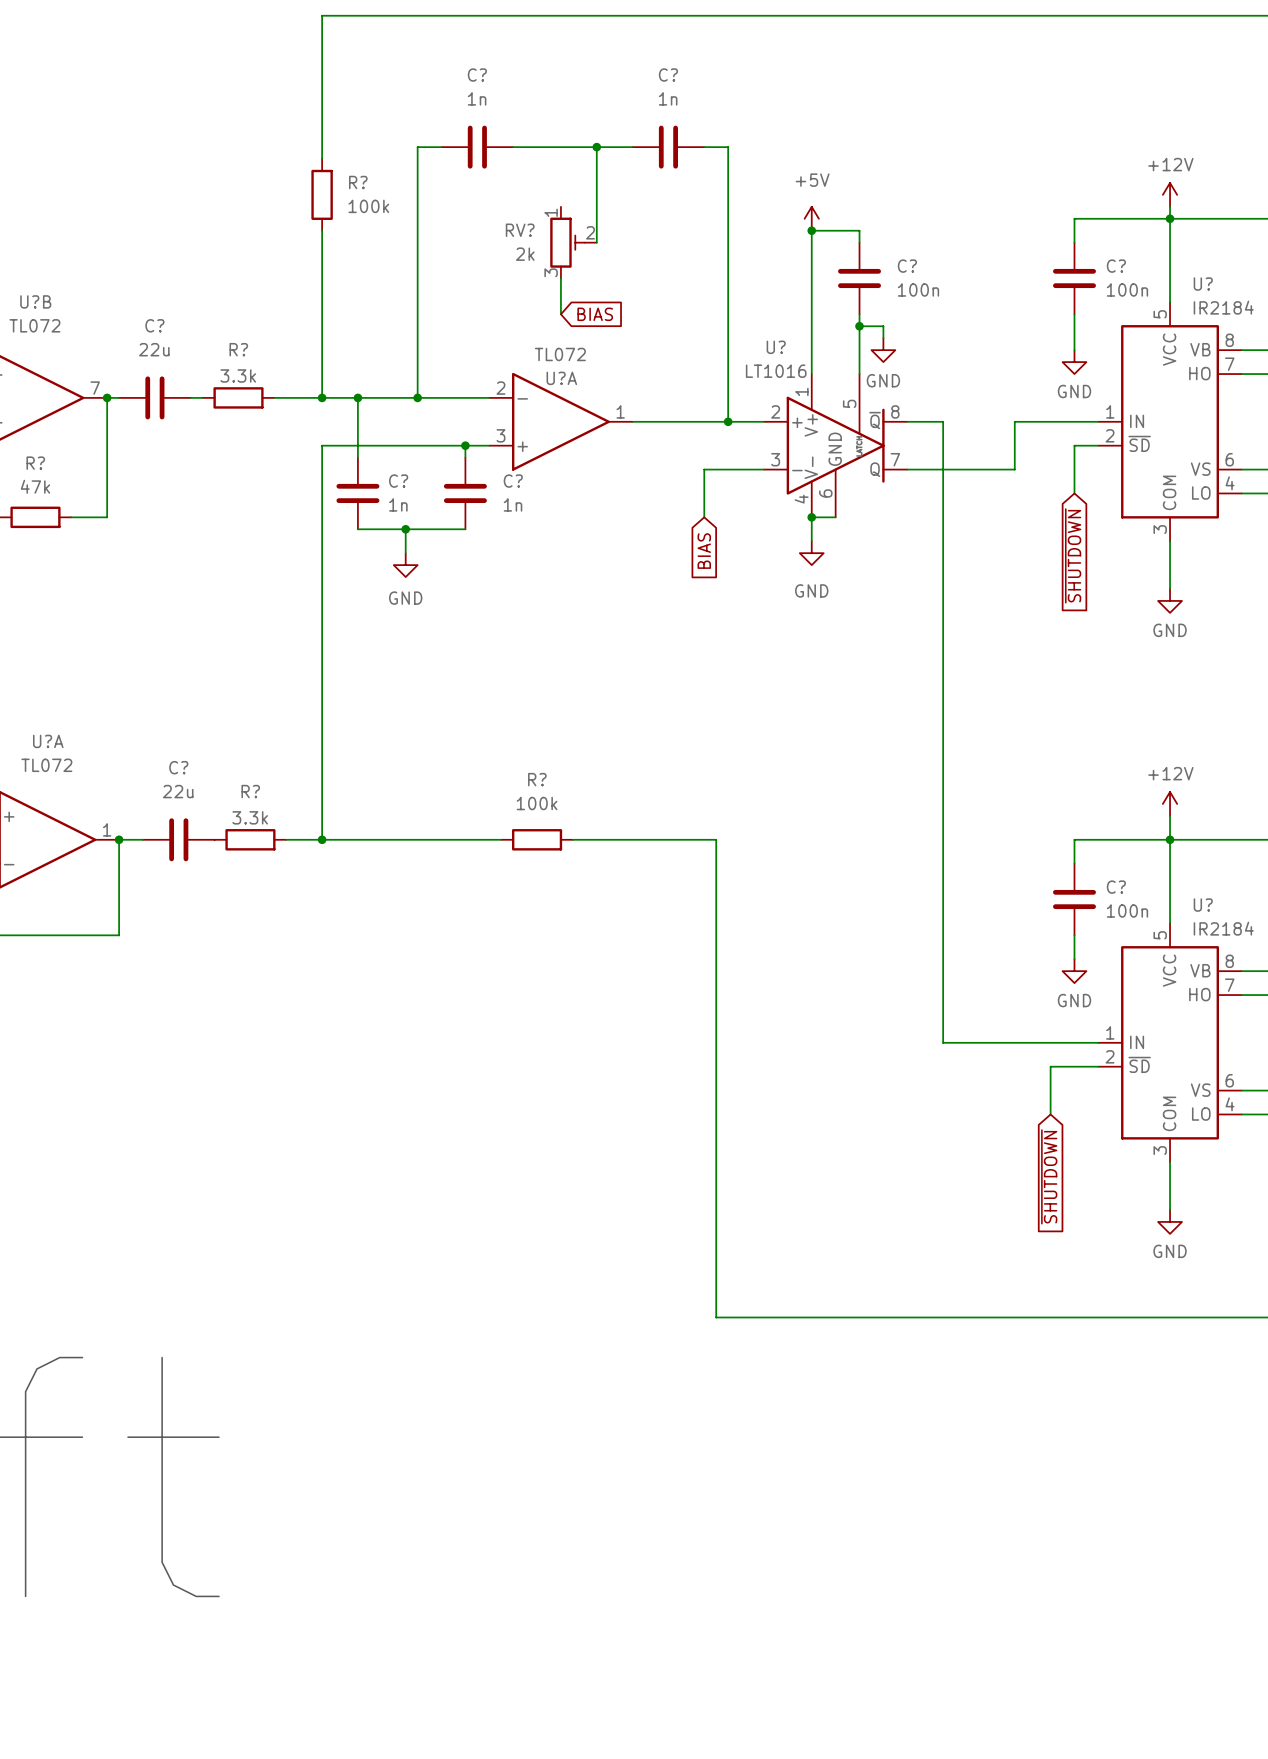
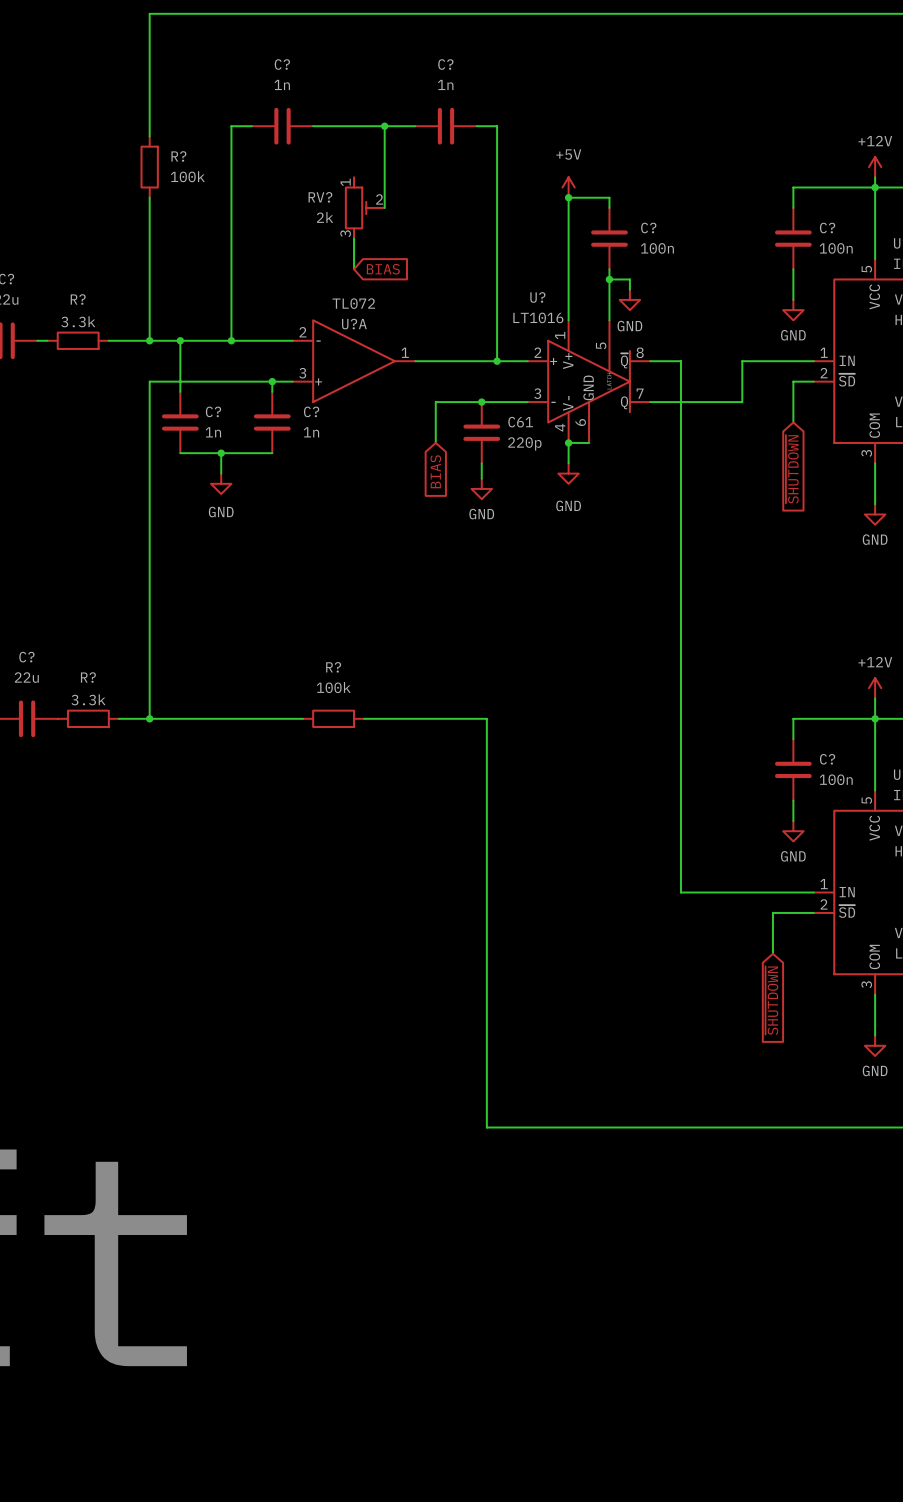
wire: (704, 469) (704, 517) -> (476, 402) (435, 402) (435, 442)
junction: none -> (481, 402)
C61: none -> 220p (481, 432)
wire: none -> (481, 463) (481, 478)
global label position: BIAS (704, 551) -> BIAS (435, 471)
power symbol: none -> GND (481, 488)

